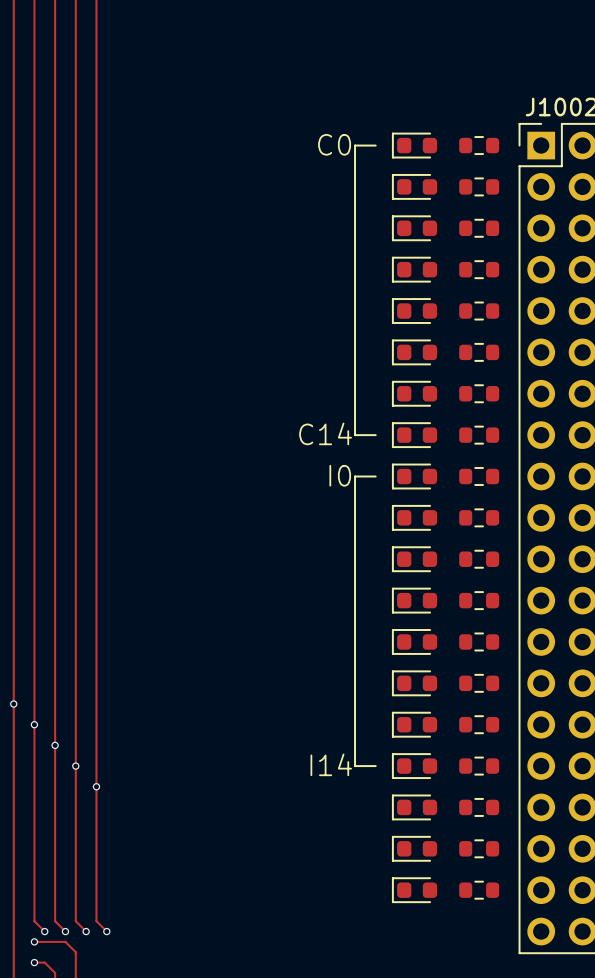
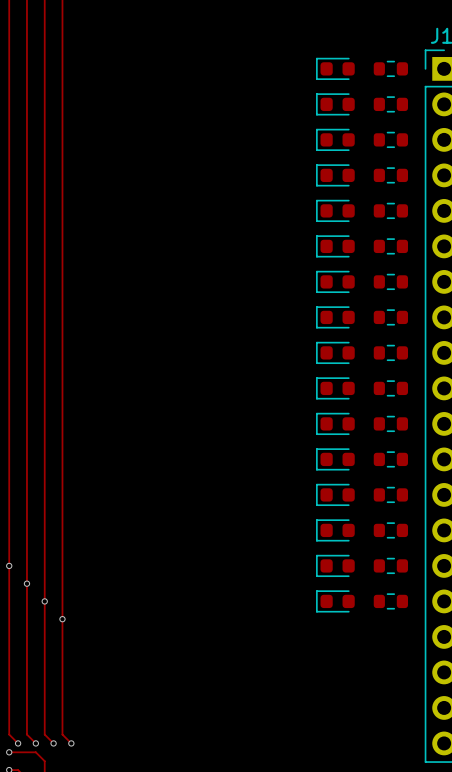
text: C0 (334, 144) -> none
line: (375, 145) (355, 145) (355, 435) (375, 435) -> none
text: C14 (325, 433) -> none
text: I0 (340, 475) -> none
line: (375, 476) (355, 476) (355, 766) (375, 766) -> none
text: I14 (331, 764) -> none
part: (414, 807) -> none
part: (479, 807) -> none
part: (414, 848) -> none
part: (479, 848) -> none
part: (414, 890) -> none
part: (479, 890) -> none

